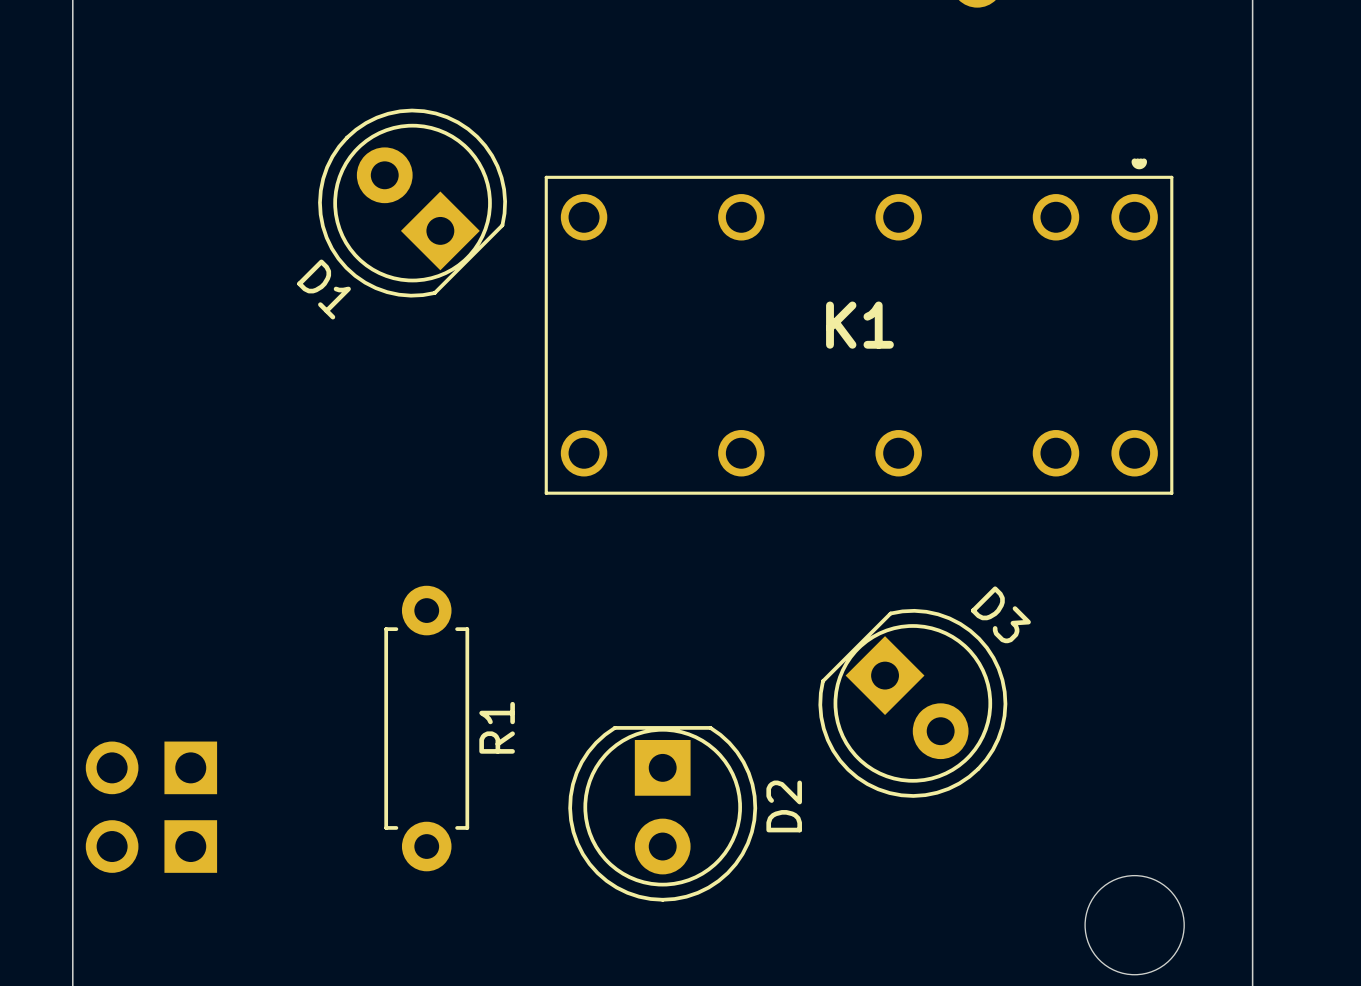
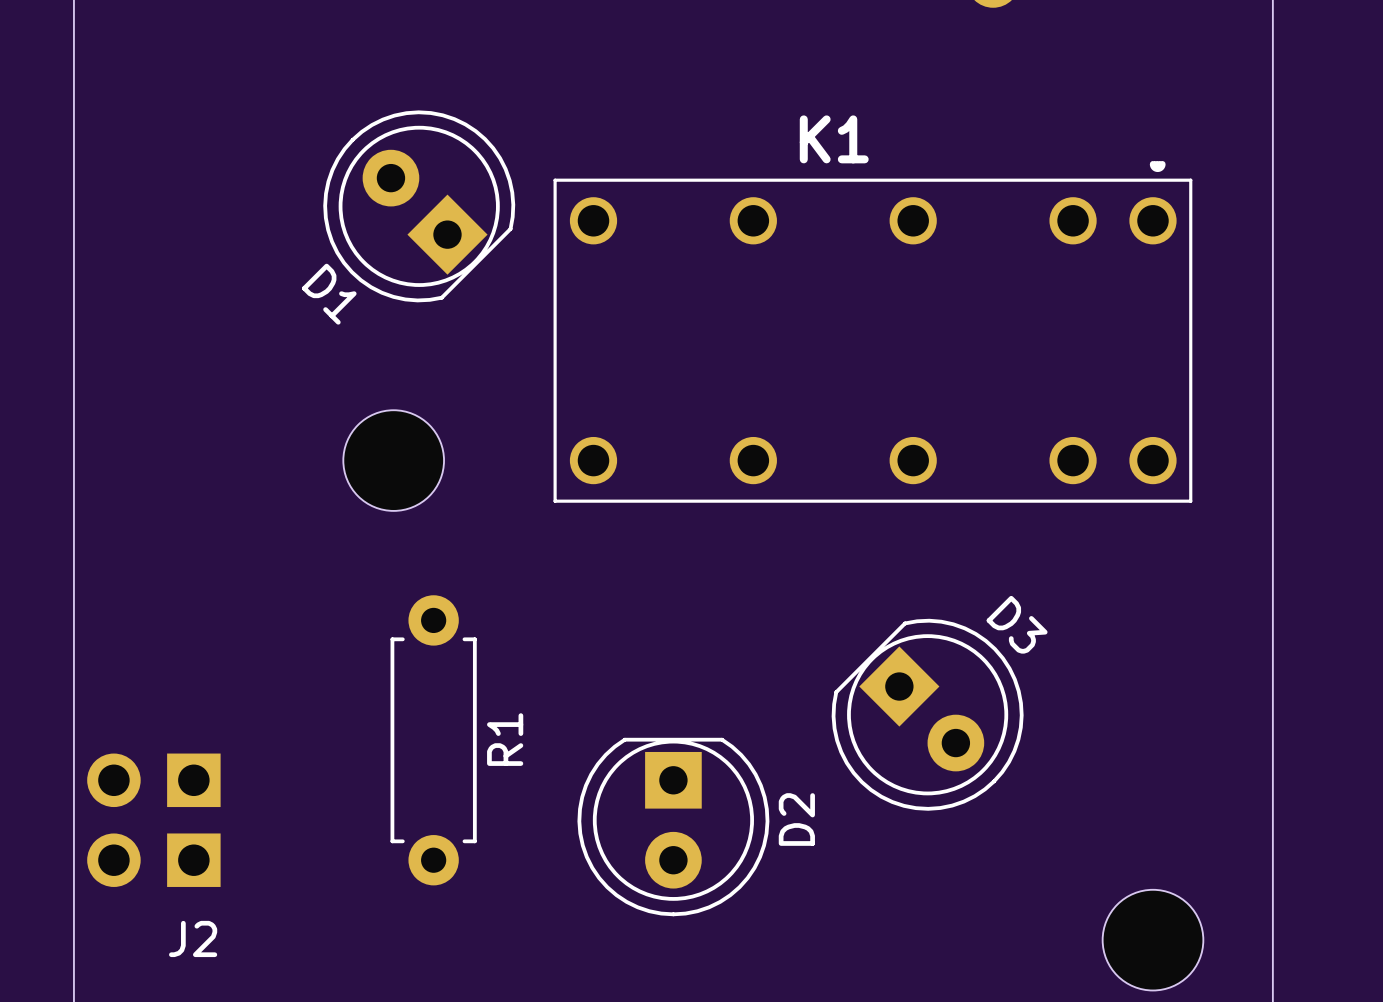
K1 name position: K1 (859, 325) -> K1 (834, 139)
part: none -> (393, 460)
J2 name: none -> J2 (193, 938)

